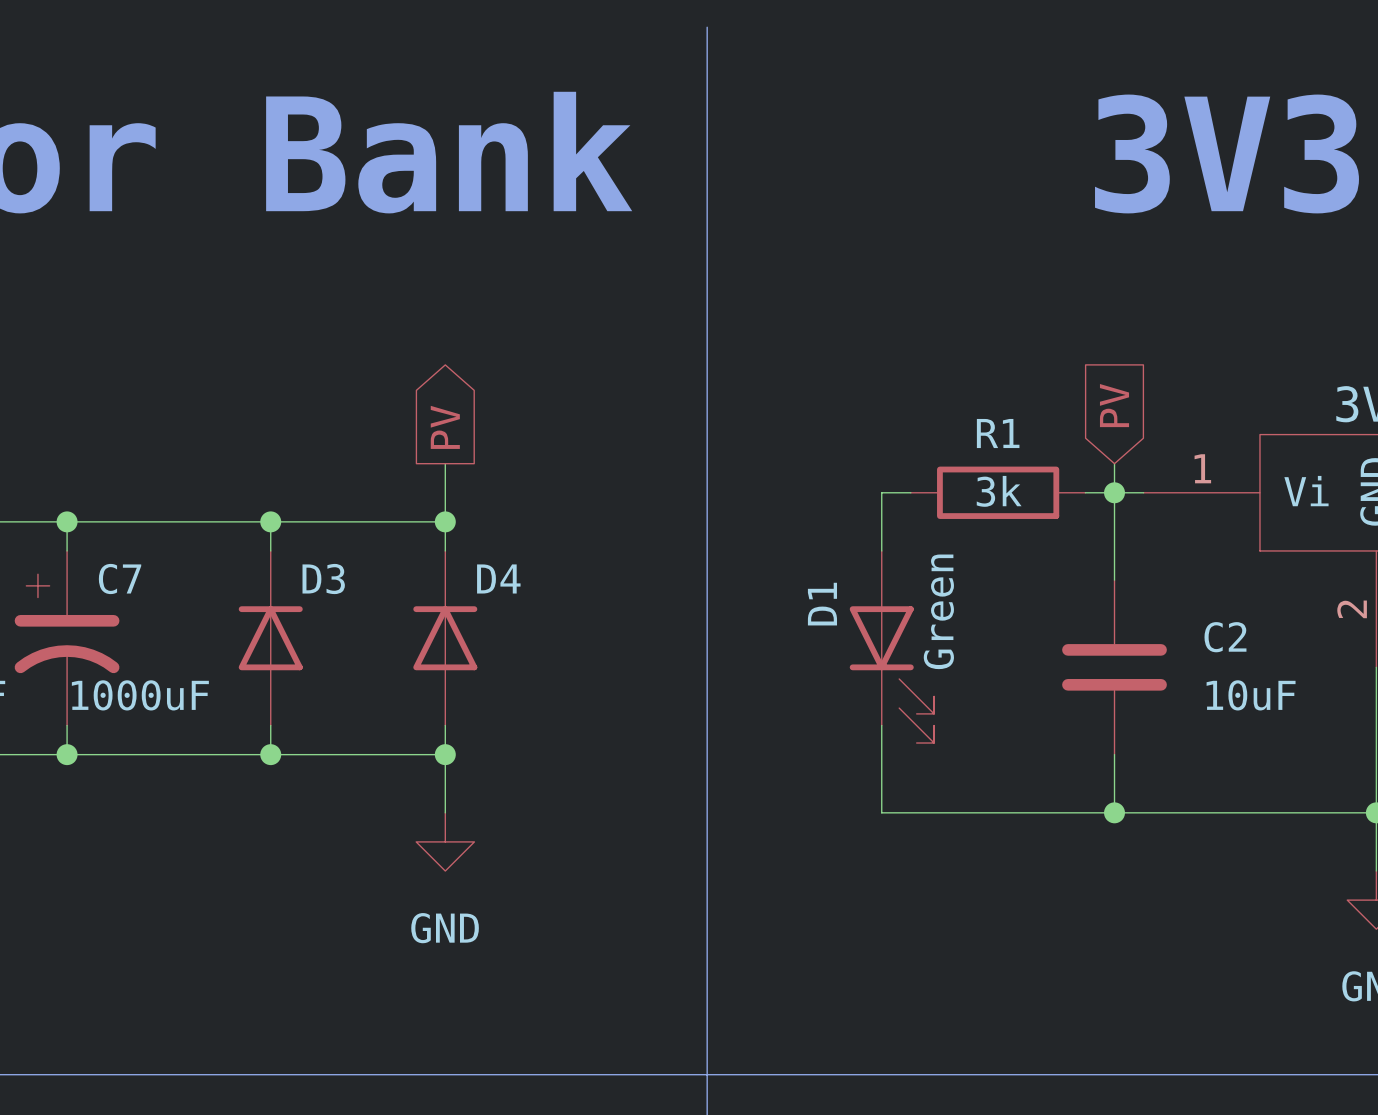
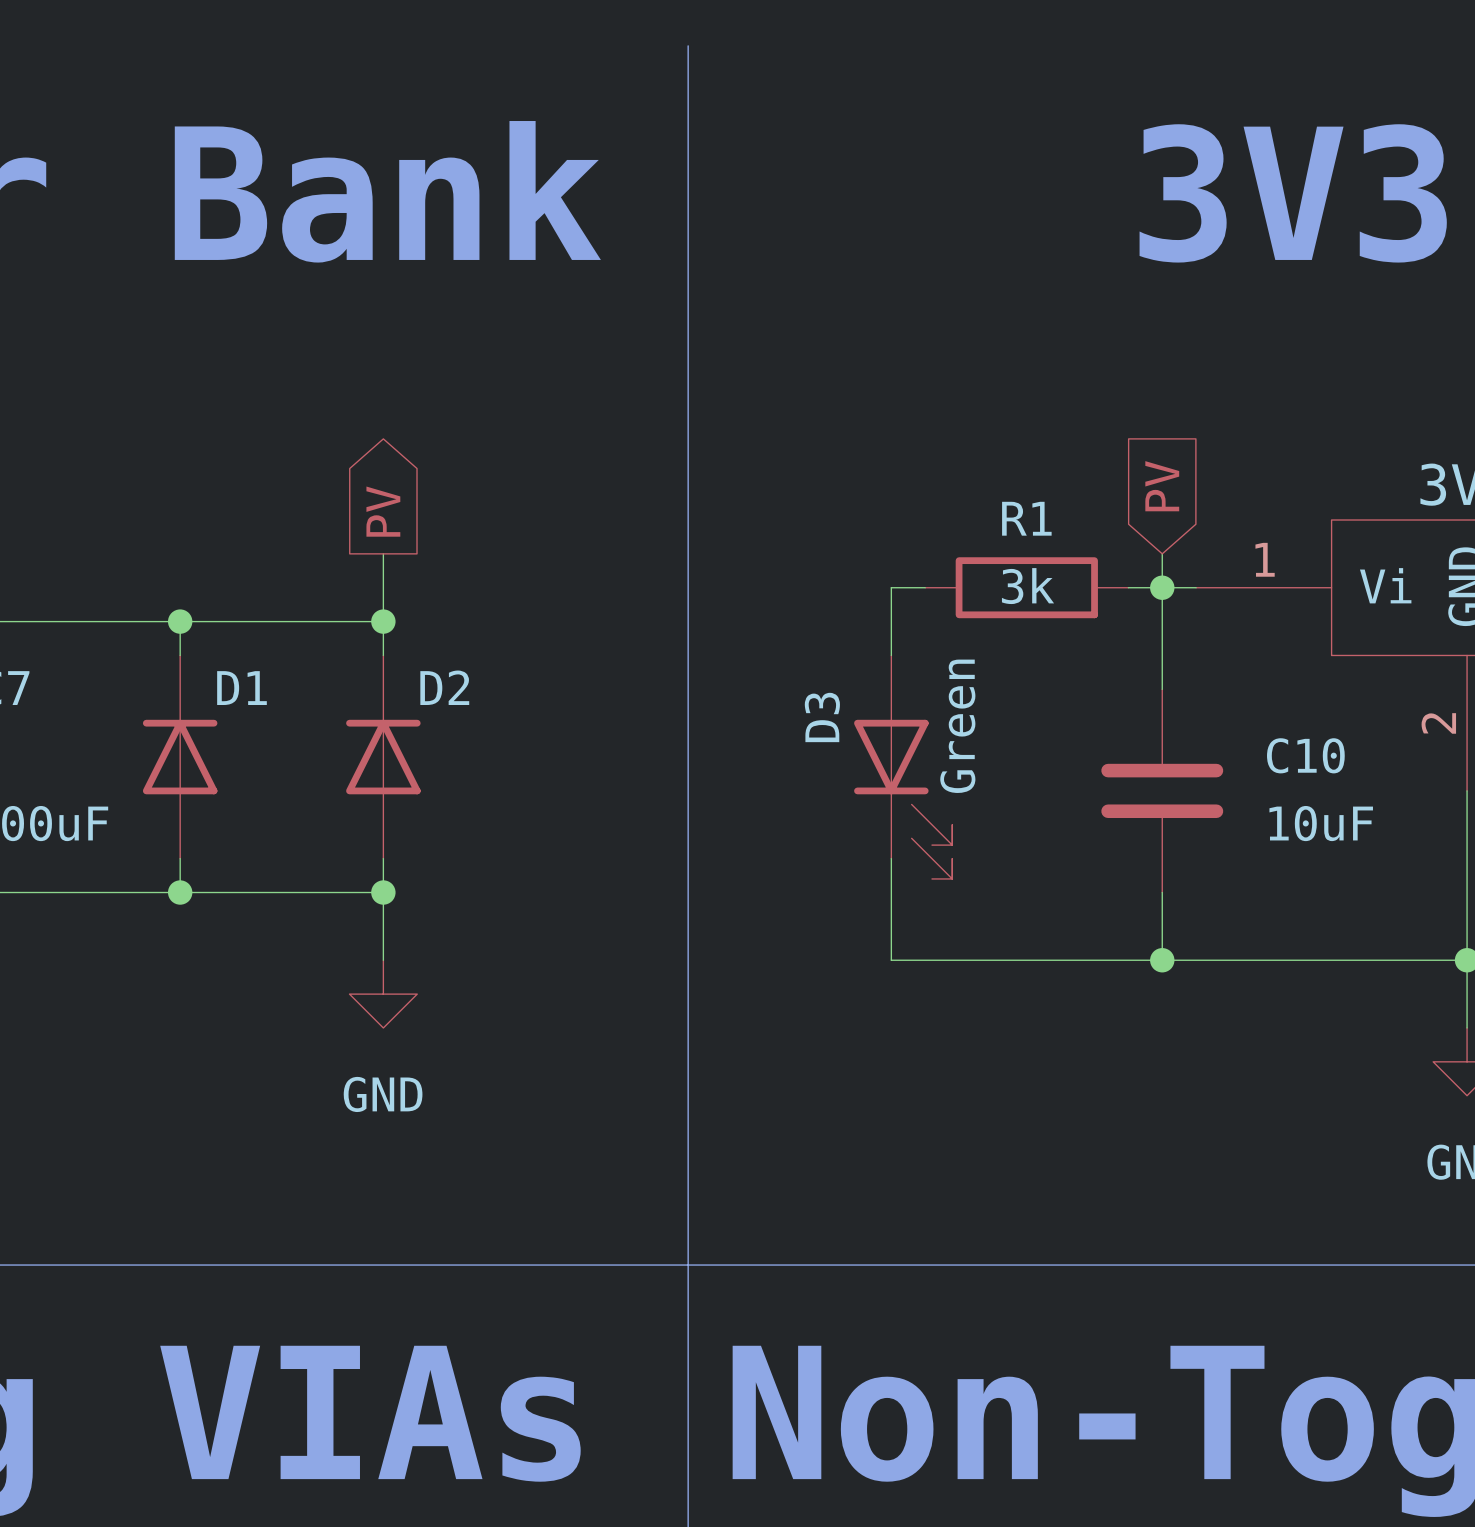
D4 name: D4 (498, 578) -> D2 (444, 687)
D3 name: D3 (323, 579) -> D1 (241, 688)
D1 name: D1 (822, 604) -> D3 (822, 717)
C2 name: C2 (1225, 637) -> C10 (1305, 755)

